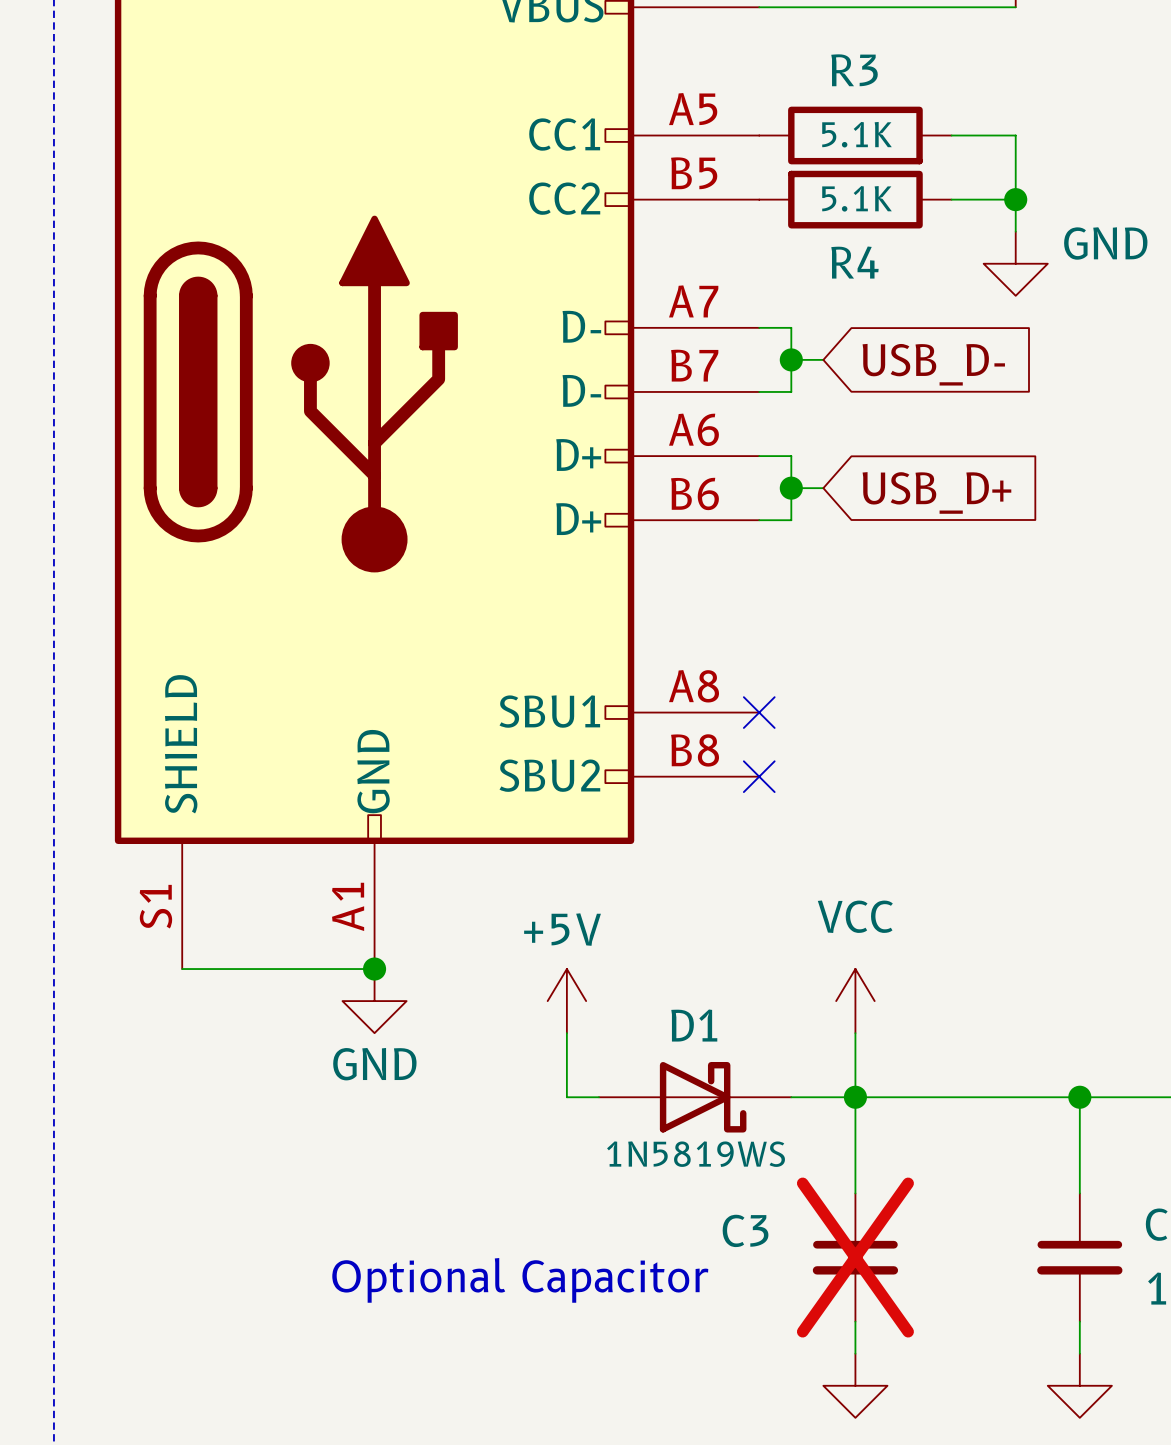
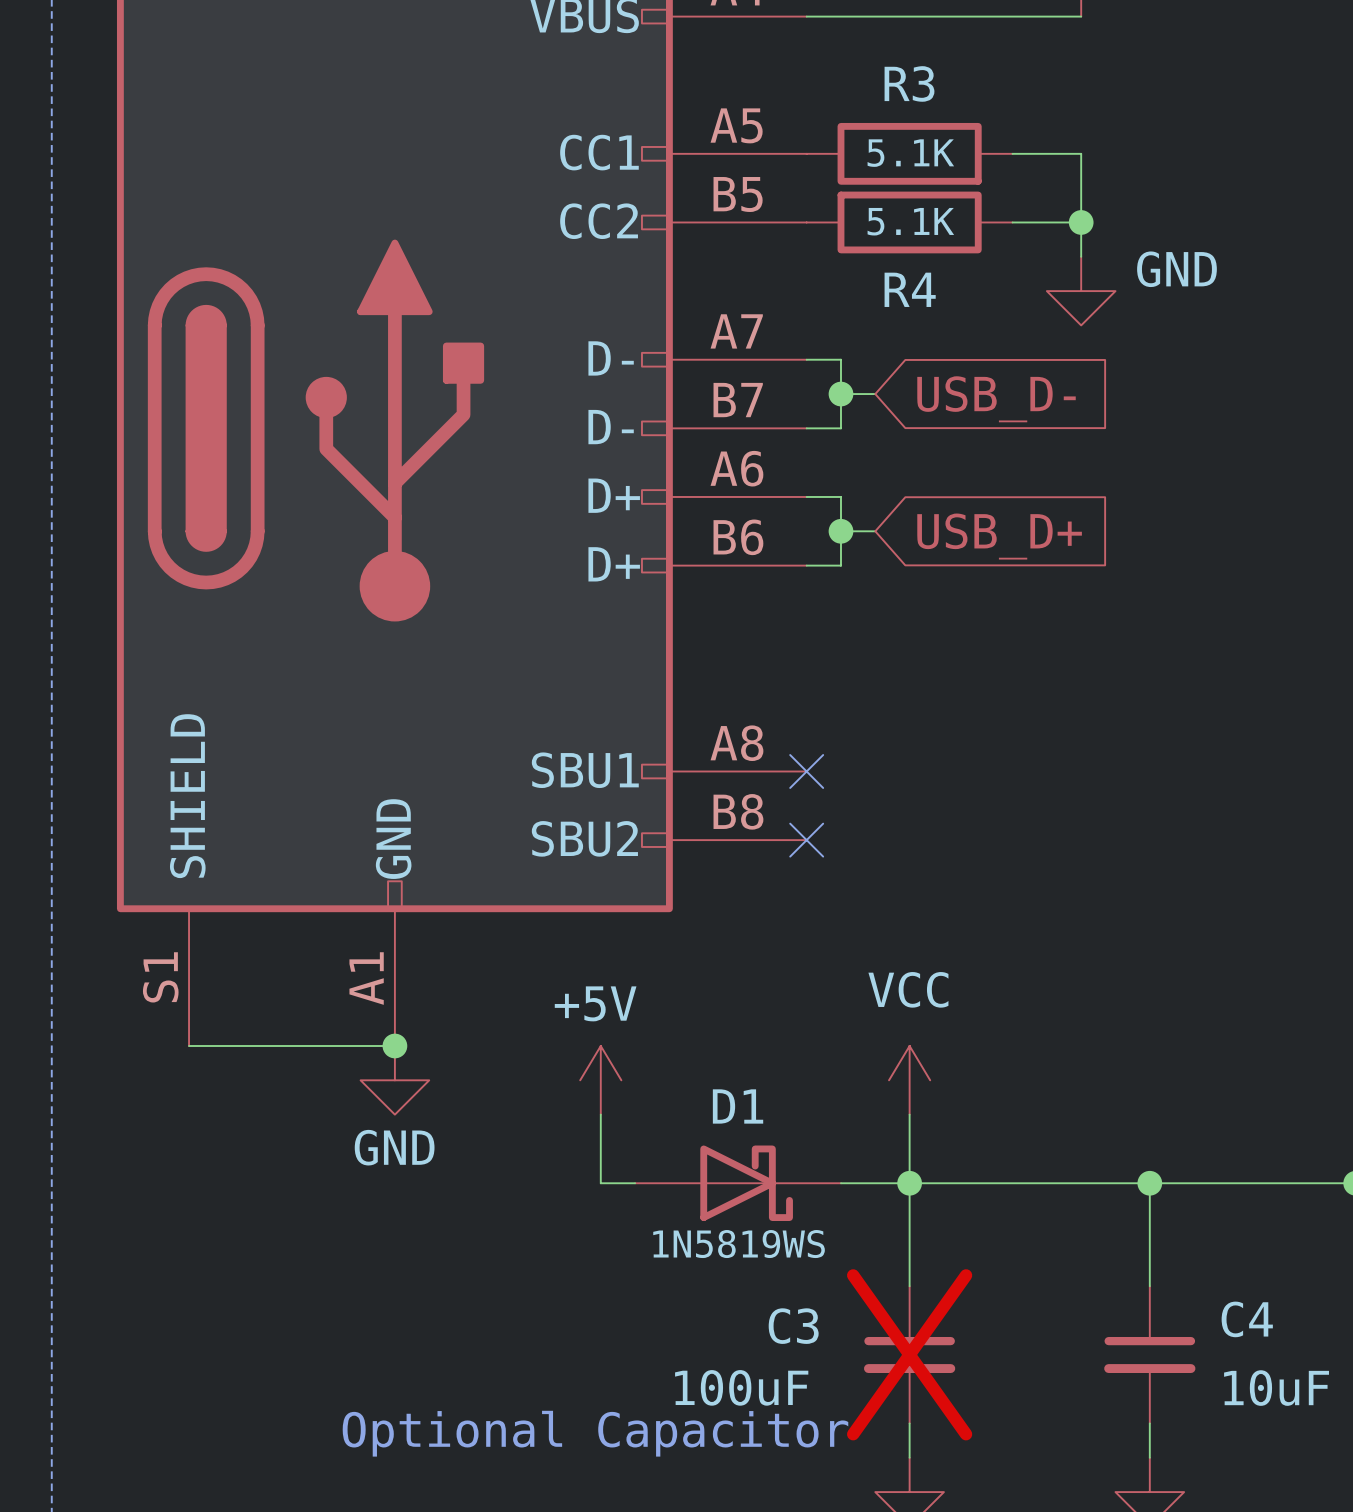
text position: Optional Capacitor (520, 1280) -> Optional Capacitor (595, 1433)
C3 value: none -> 100uF (741, 1387)

